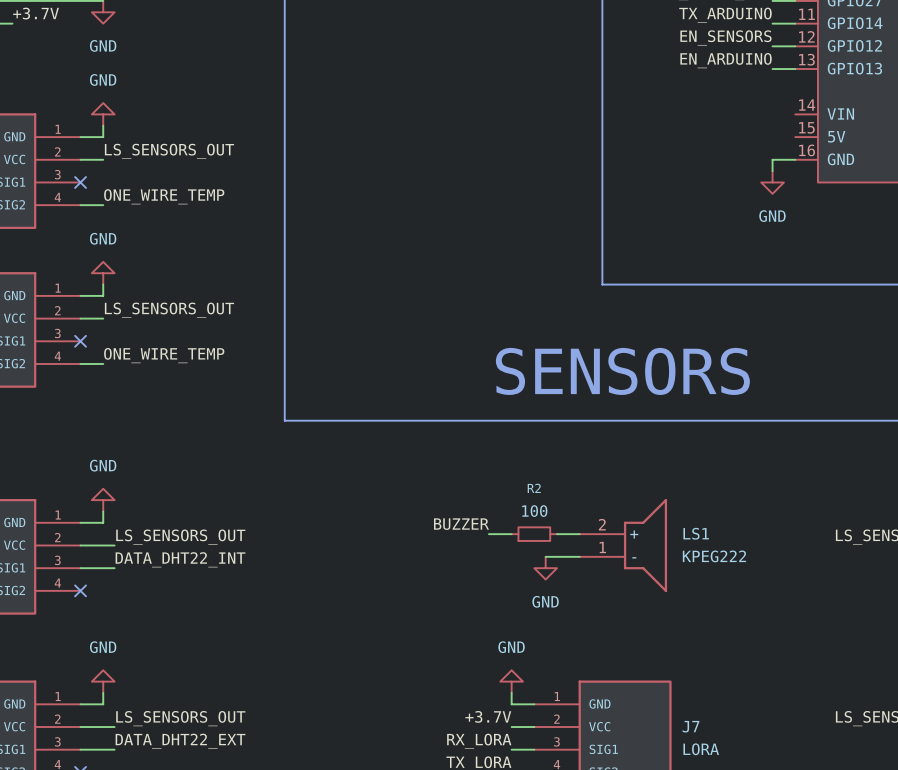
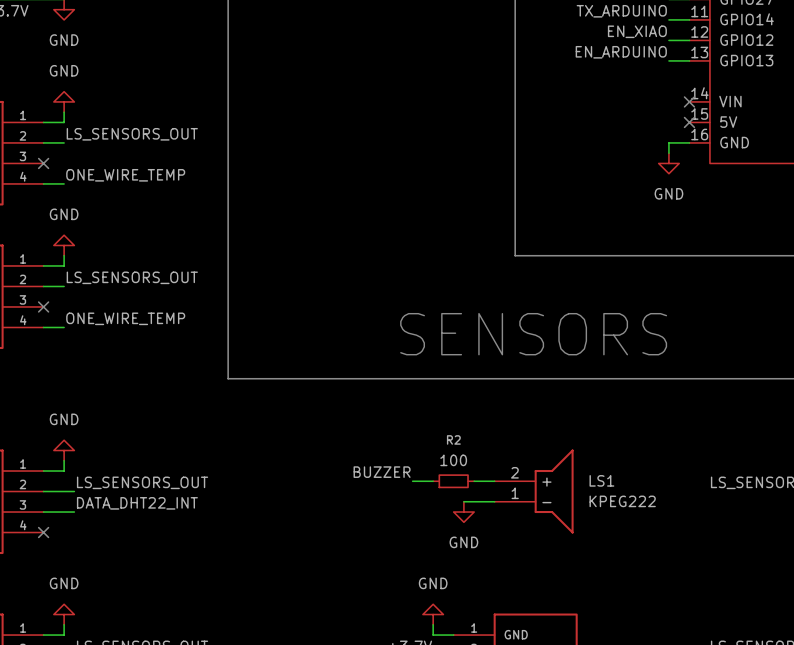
label: EN_SENSORS (725, 37) -> EN_XIAO (637, 31)
no-connect mark: none -> (689, 101)
no-connect mark: none -> (689, 122)

